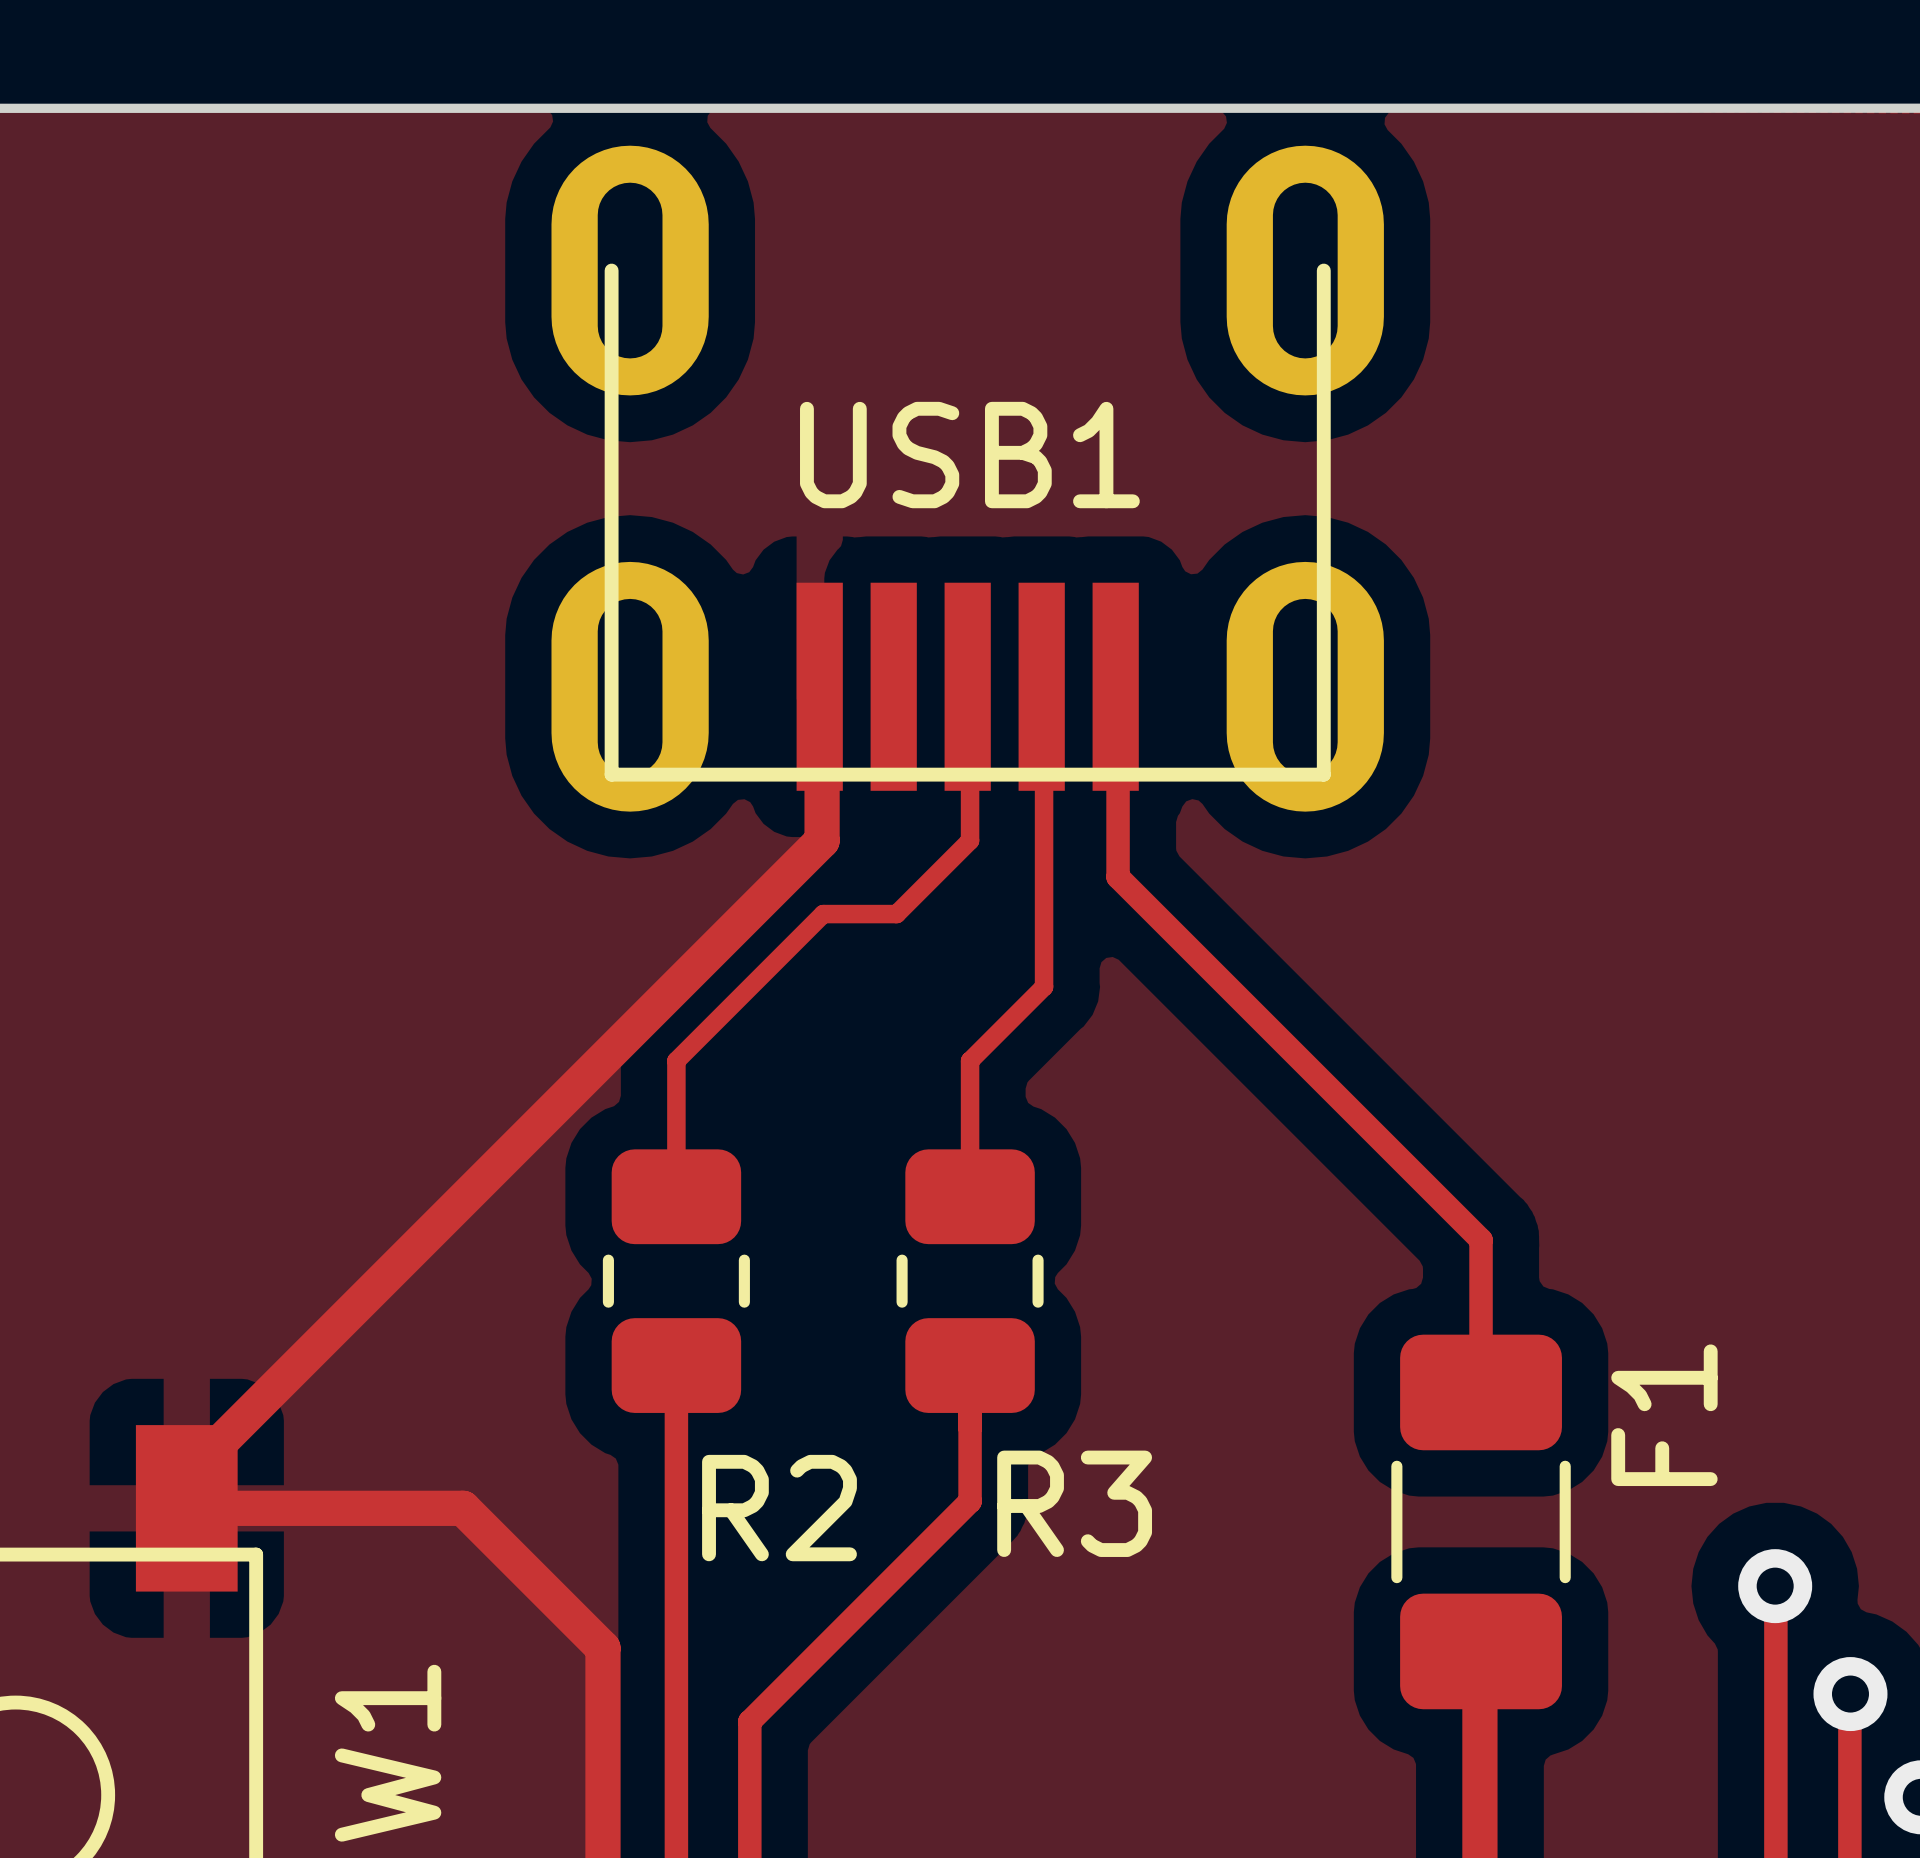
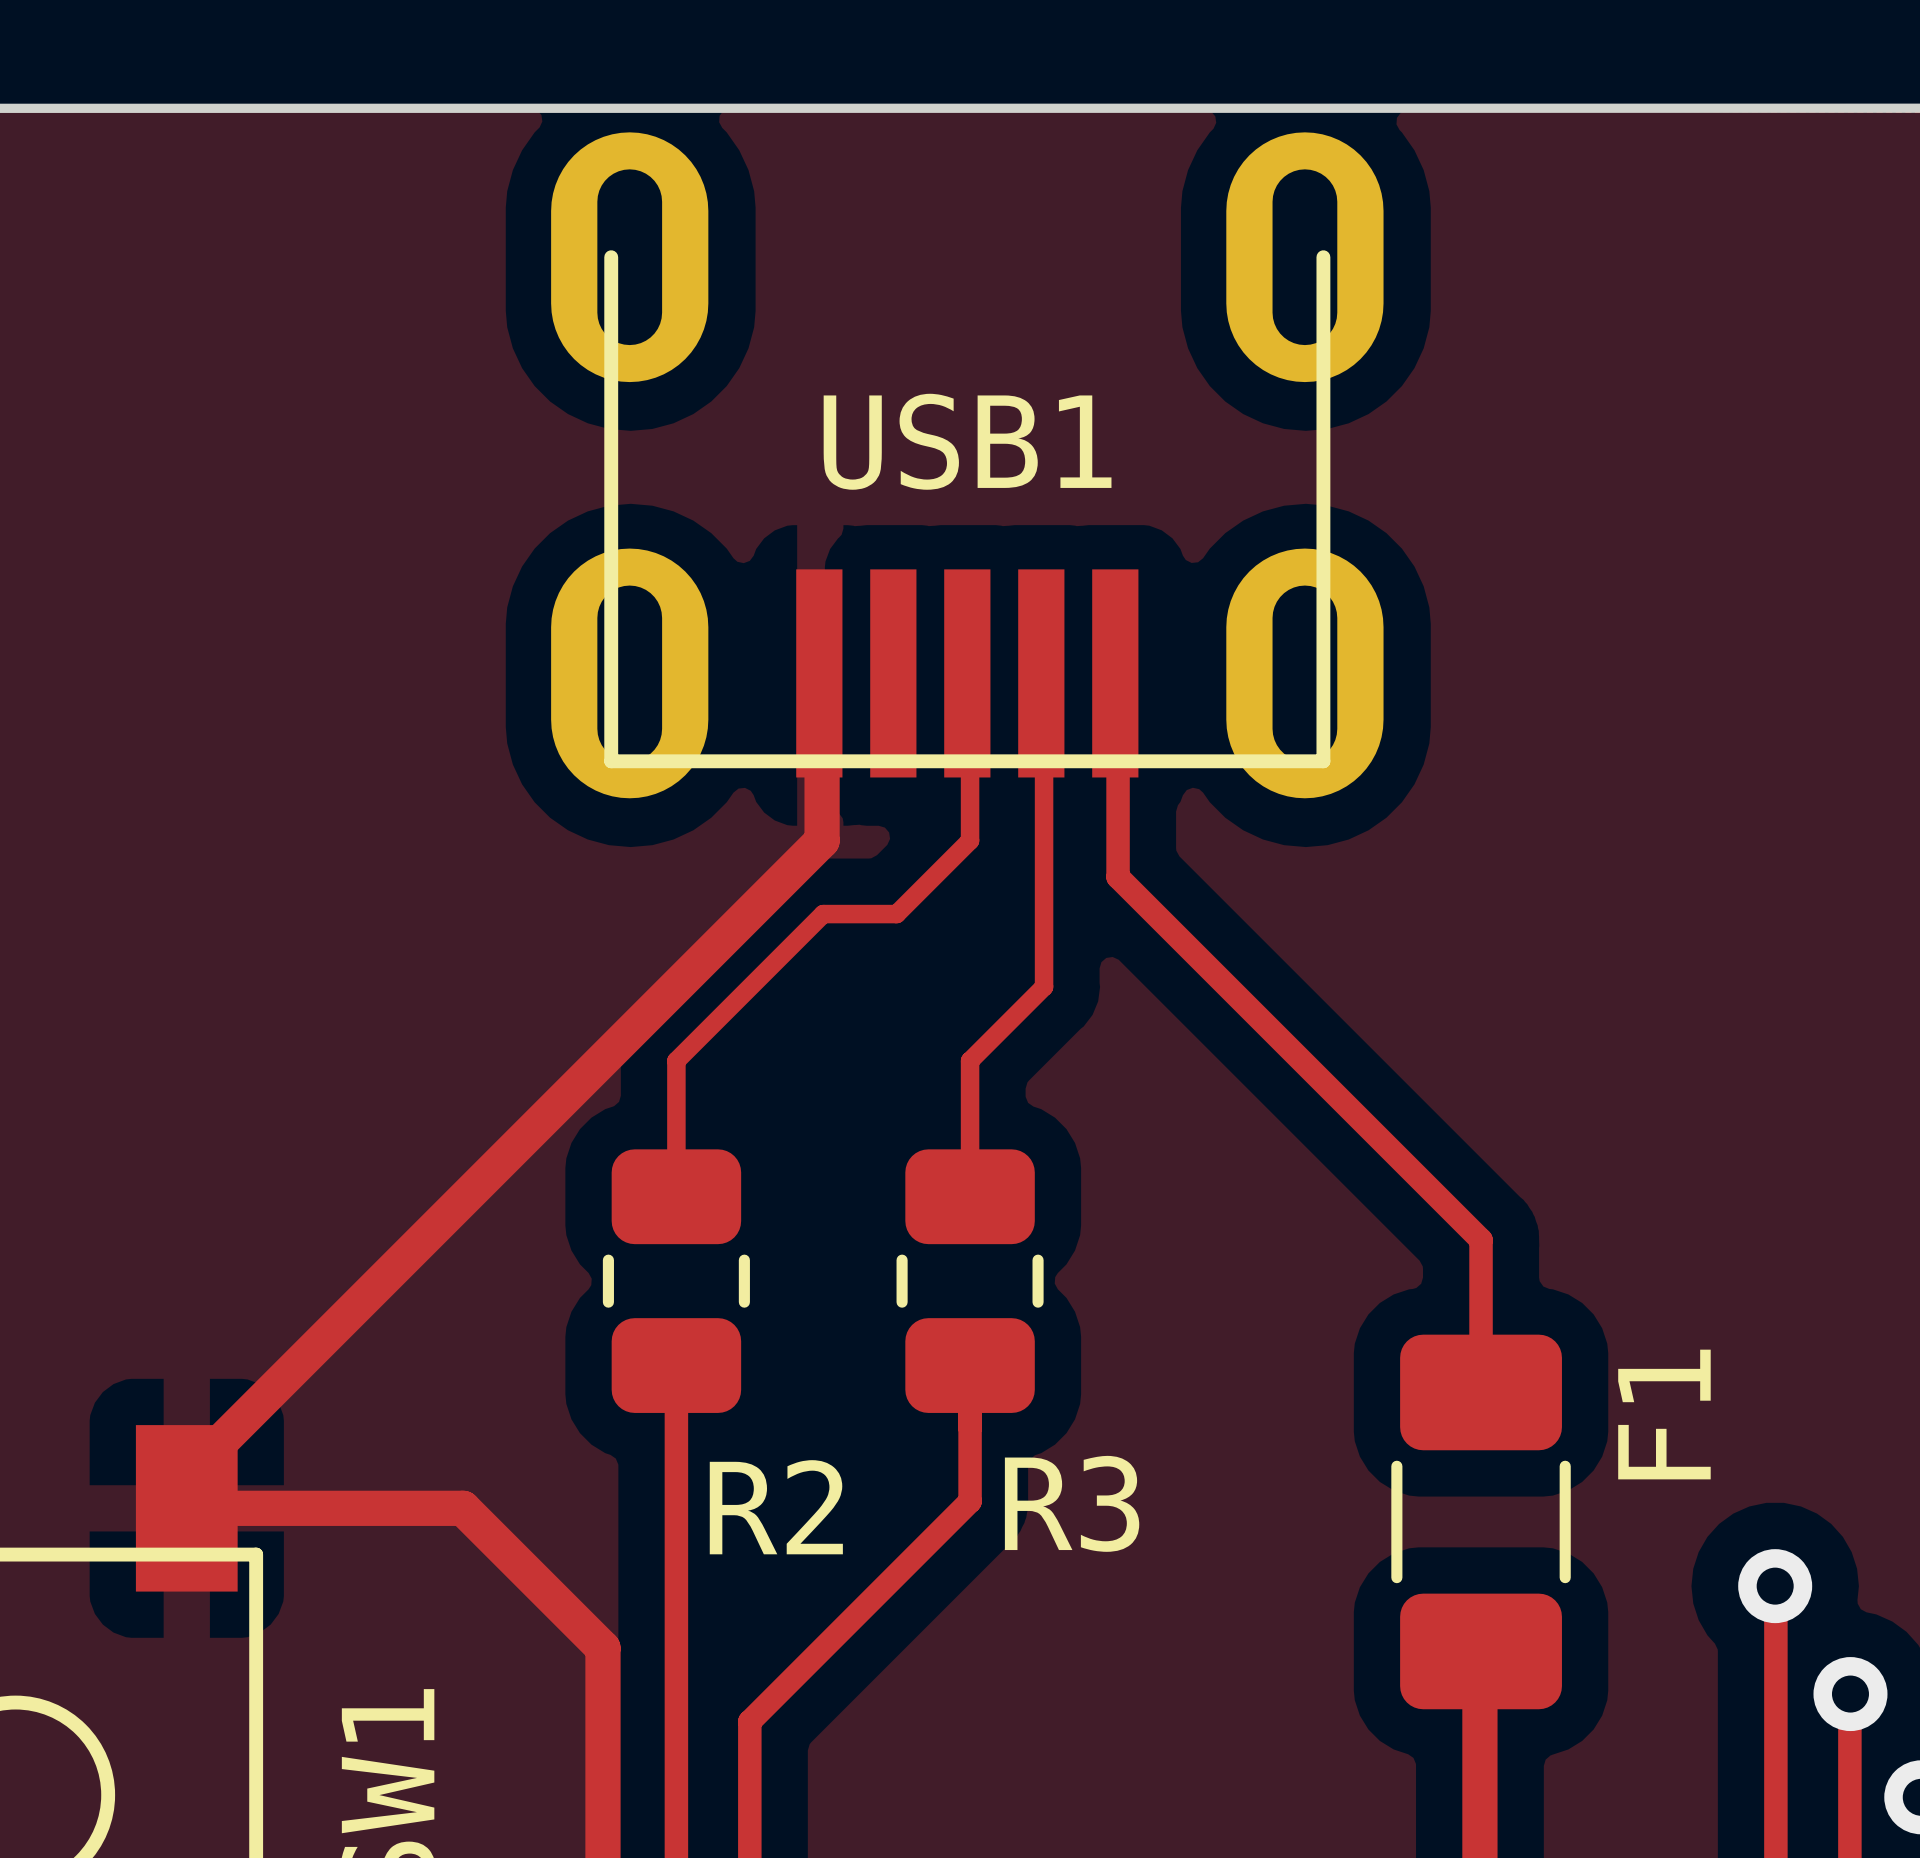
USB1 position: (967, 478) -> (967, 465)

